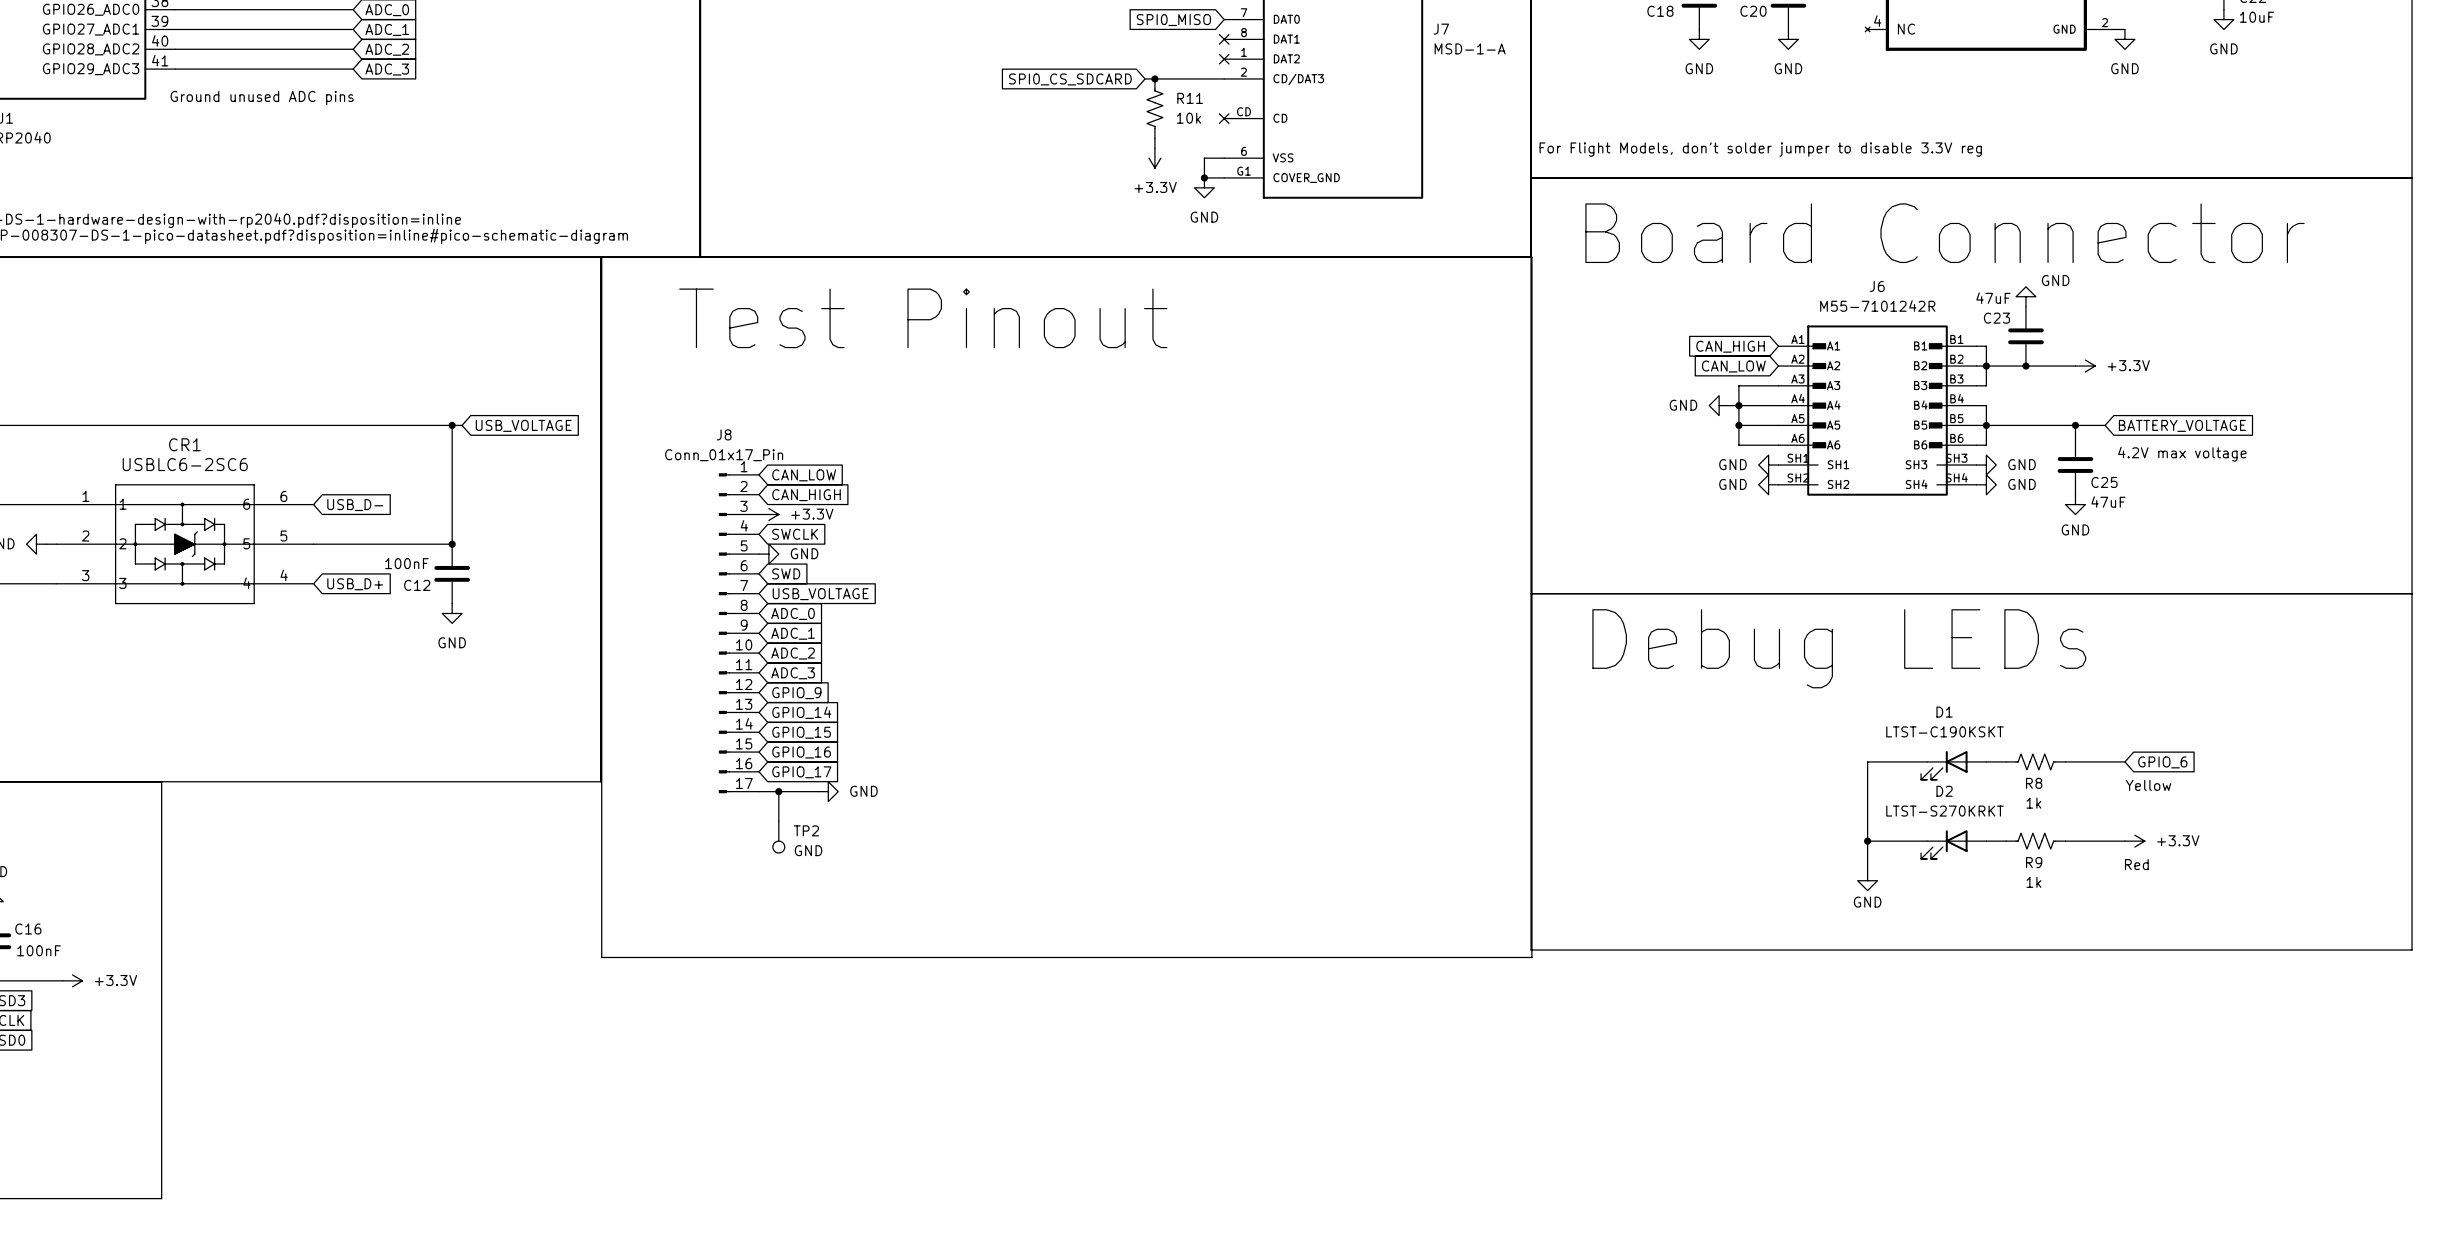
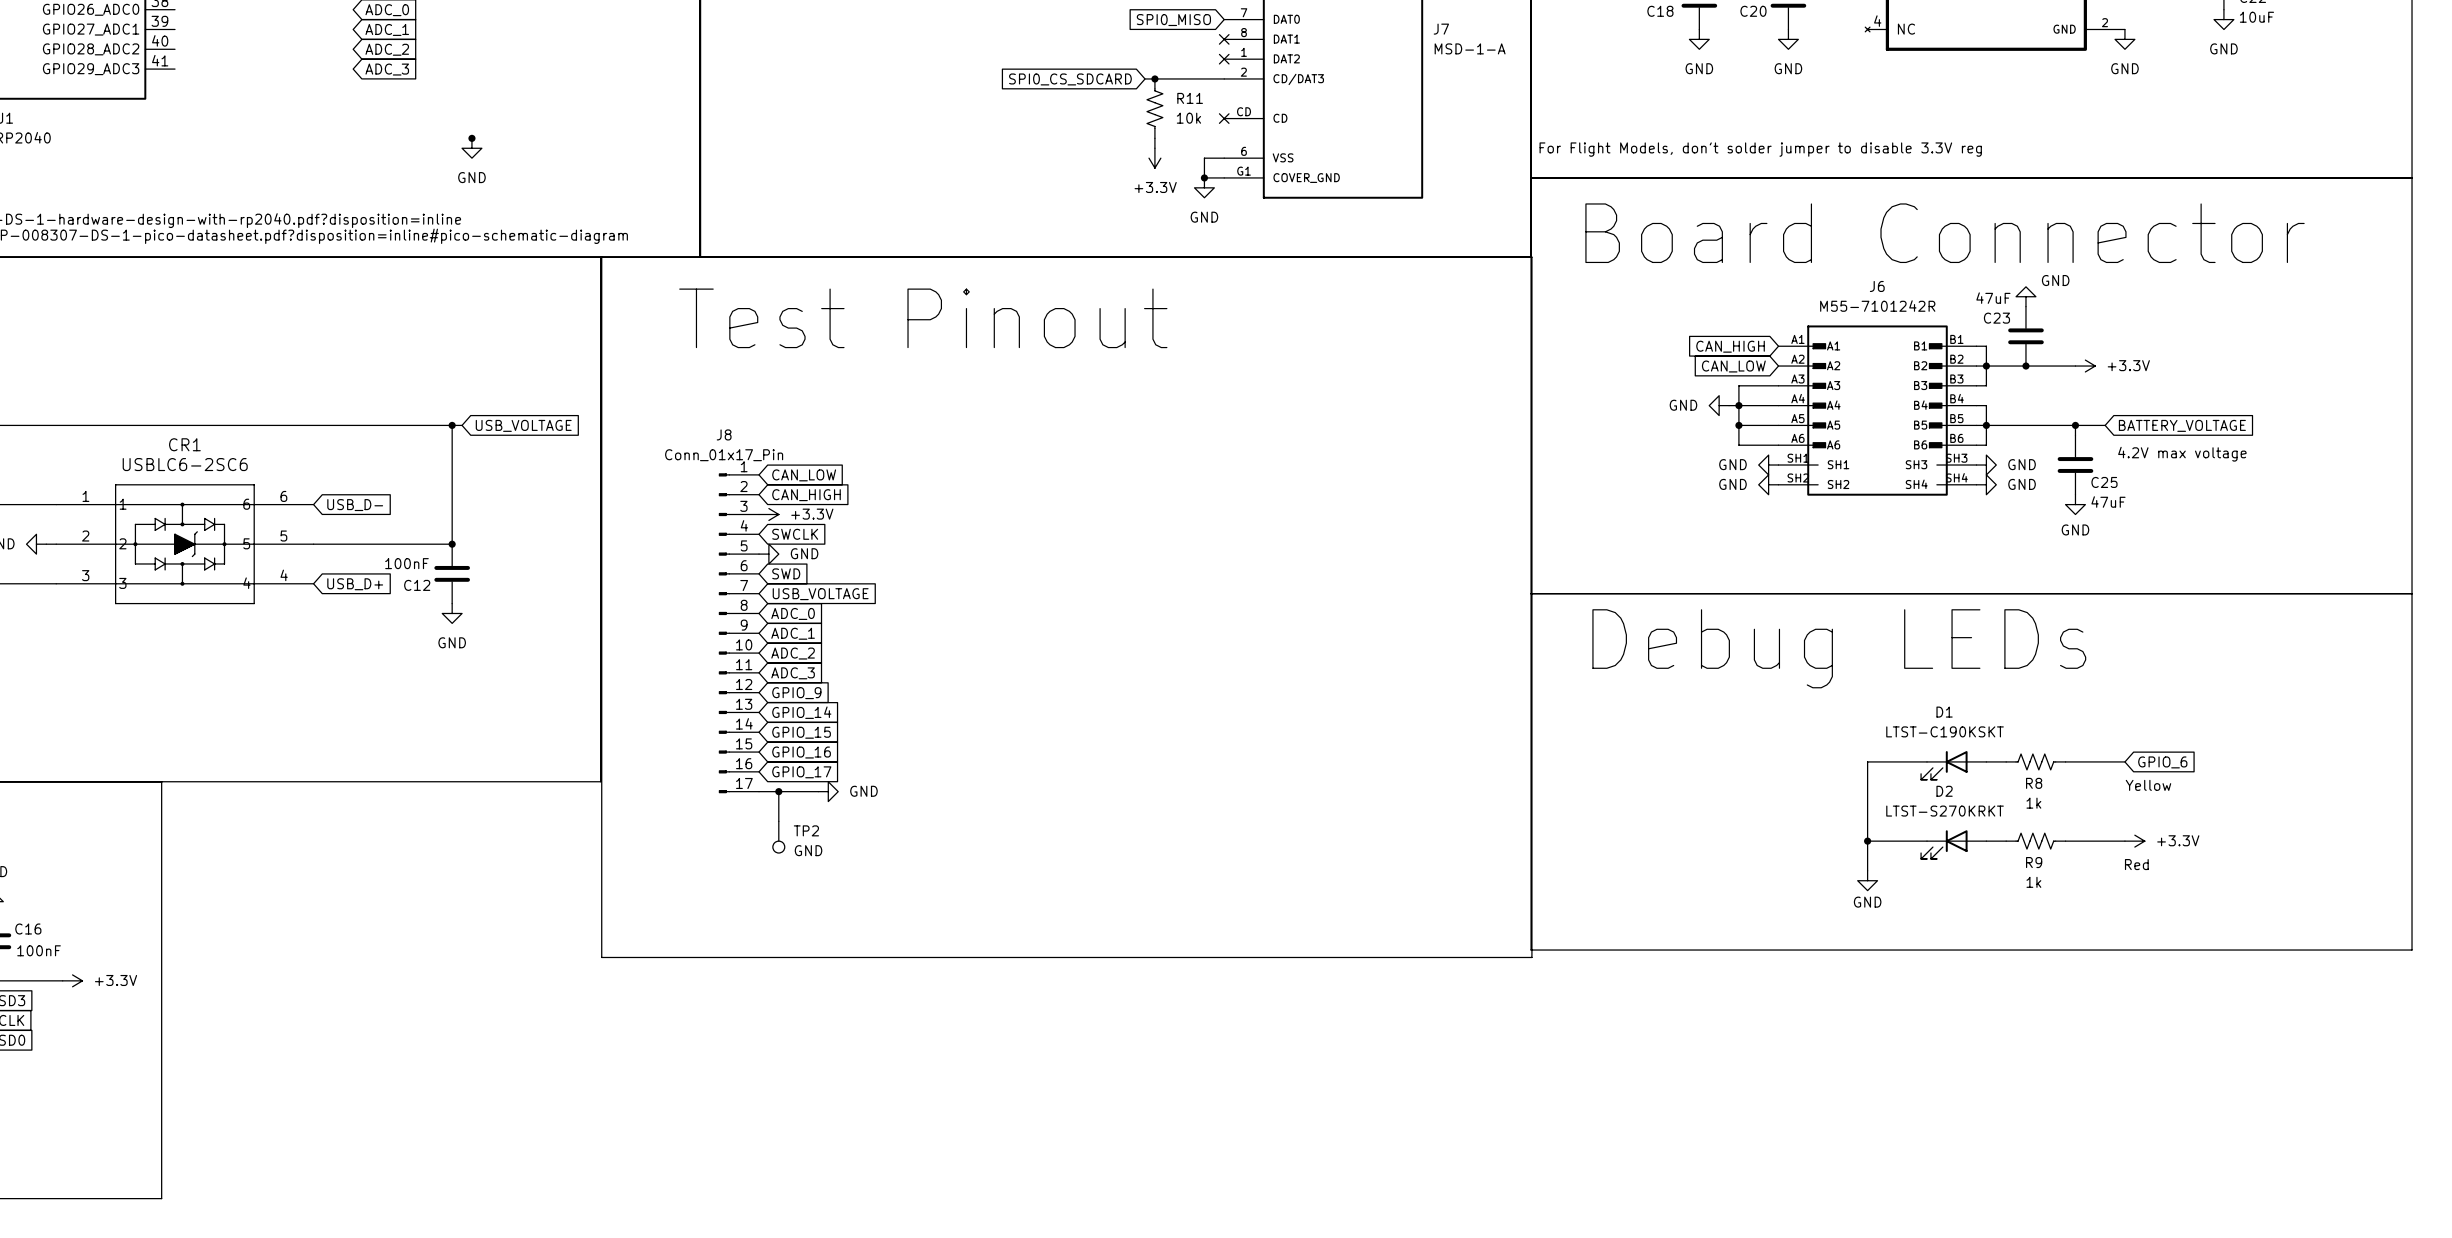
wire: (175, 9) (353, 9) -> none
wire: (175, 29) (353, 29) -> none
wire: (175, 49) (353, 49) -> none
wire: (175, 69) (353, 69) -> none
text: Ground unused ADC pins (262, 98) -> none
junction: none -> (471, 138)
power symbol: none -> GND (471, 148)

